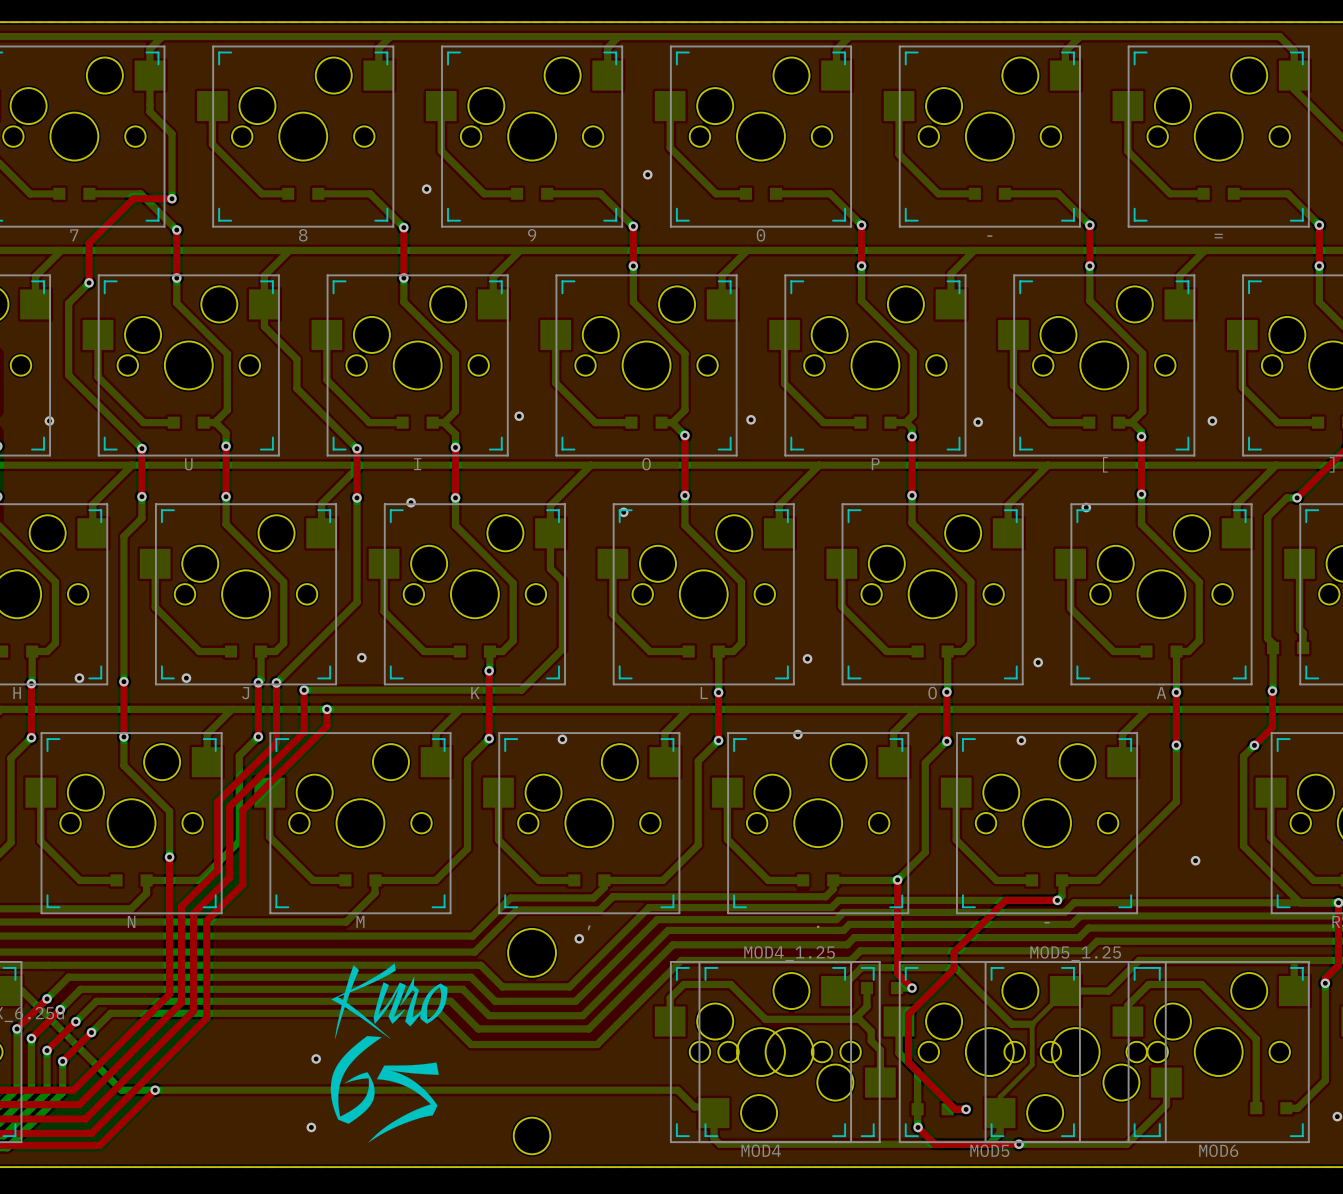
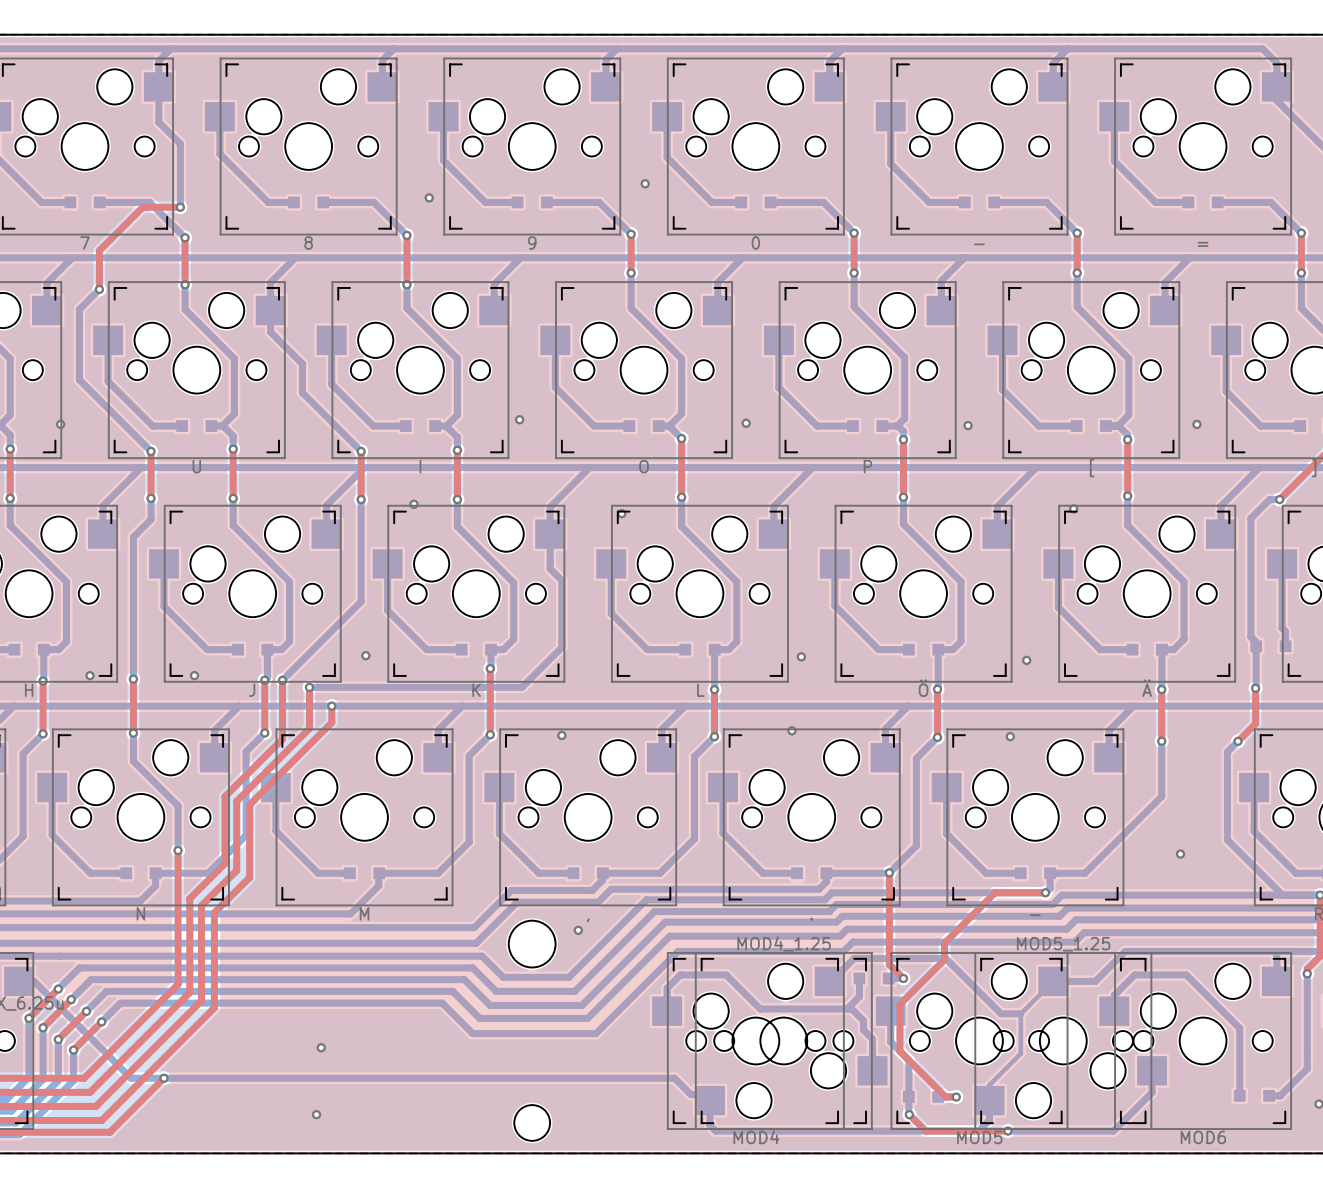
drawing: [330, 963, 448, 1143] -> none

